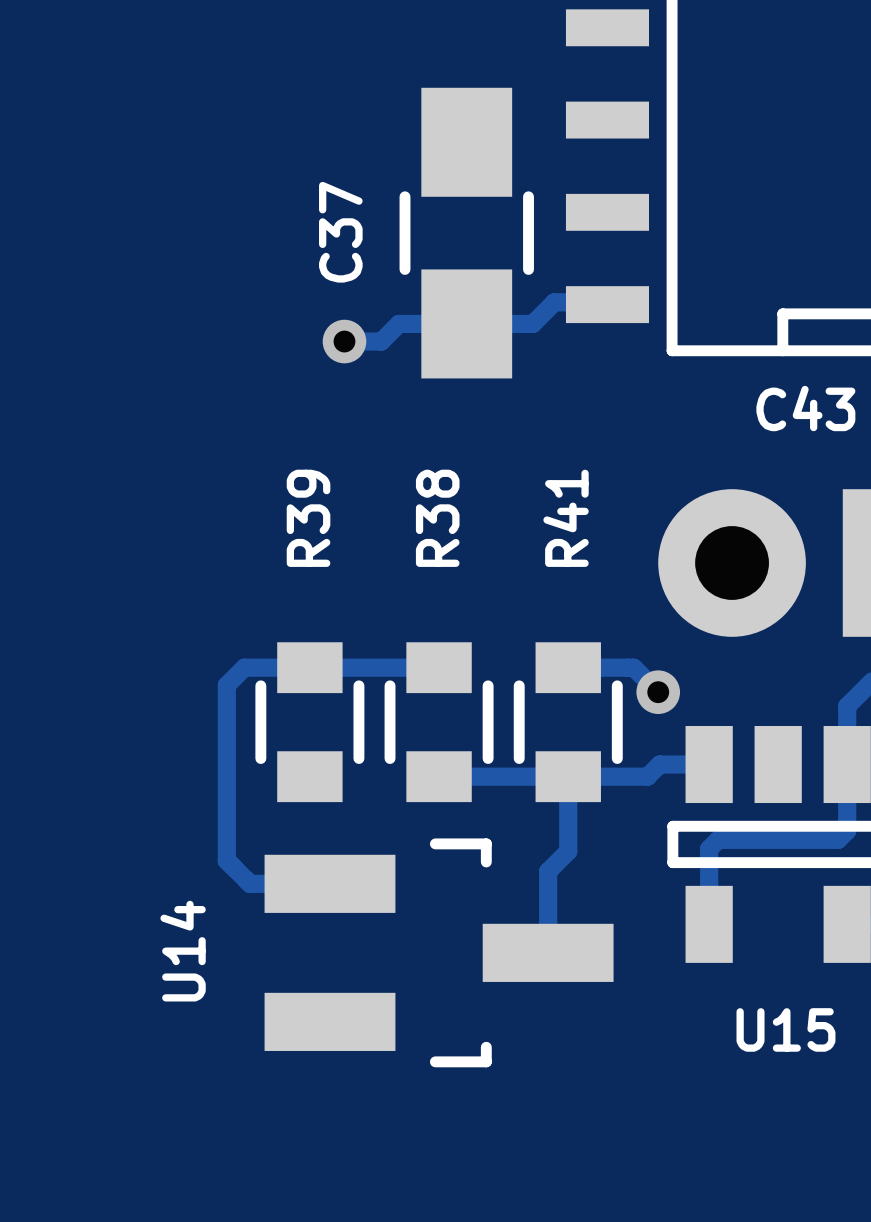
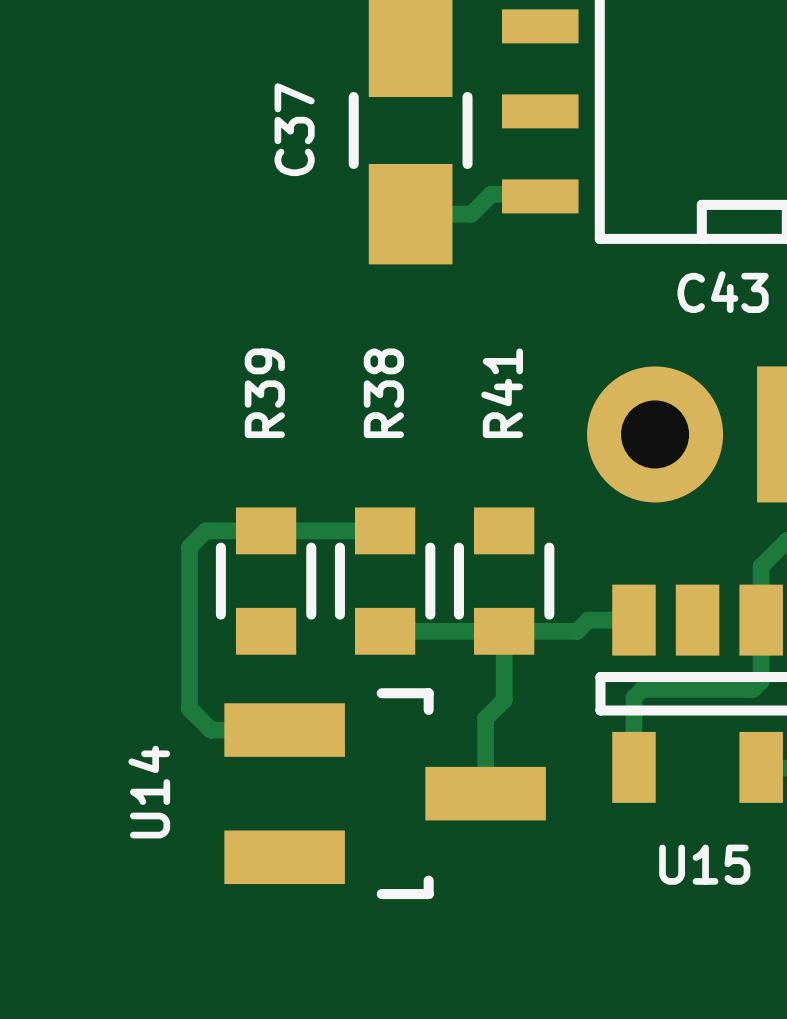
track: (466, 323) (399, 323) (381, 341) (344, 341) -> none
via: (344, 341) -> none
track: (568, 667) (633, 667) (658, 692) -> none
via: (658, 692) -> none

